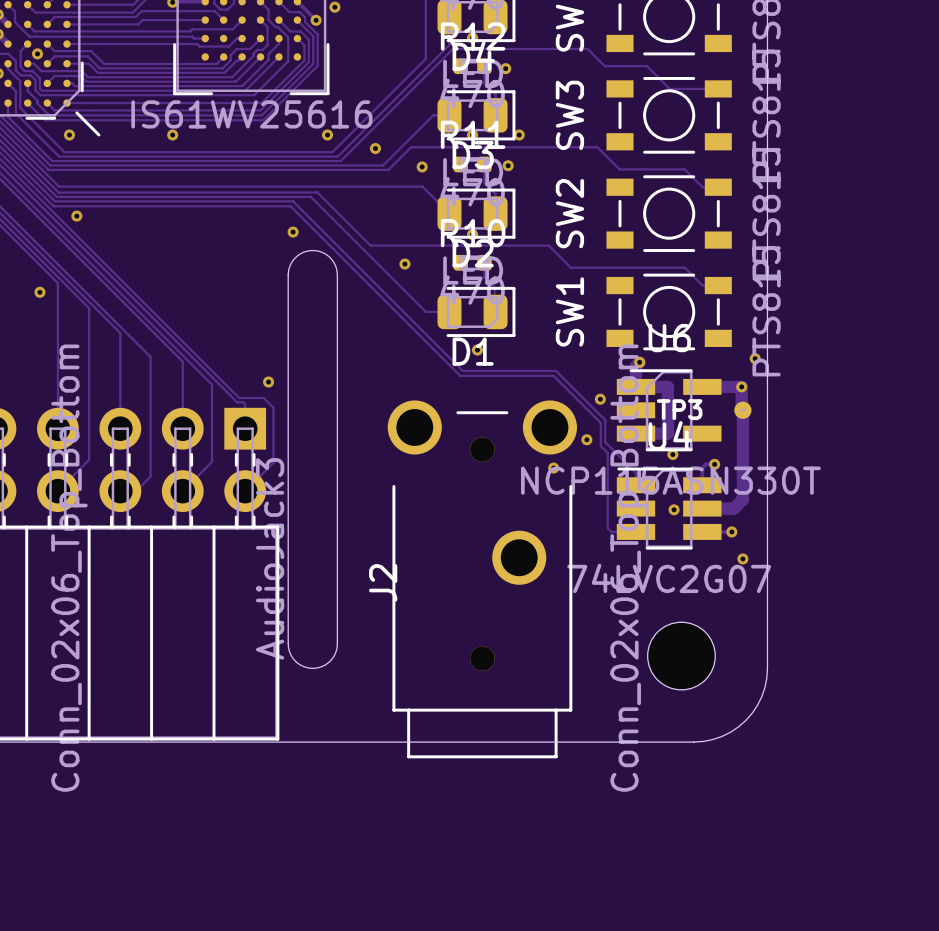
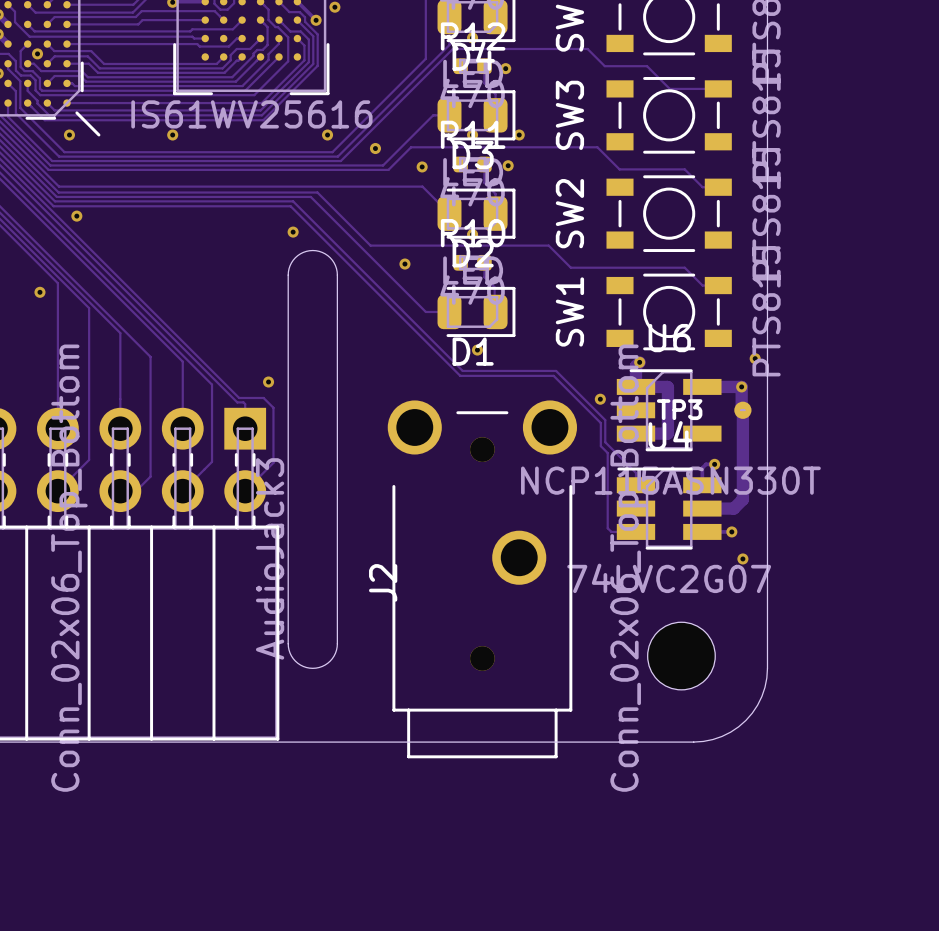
via: (586, 439) -> none
via: (672, 454) -> none
via: (553, 468) -> none
via: (674, 509) -> none

